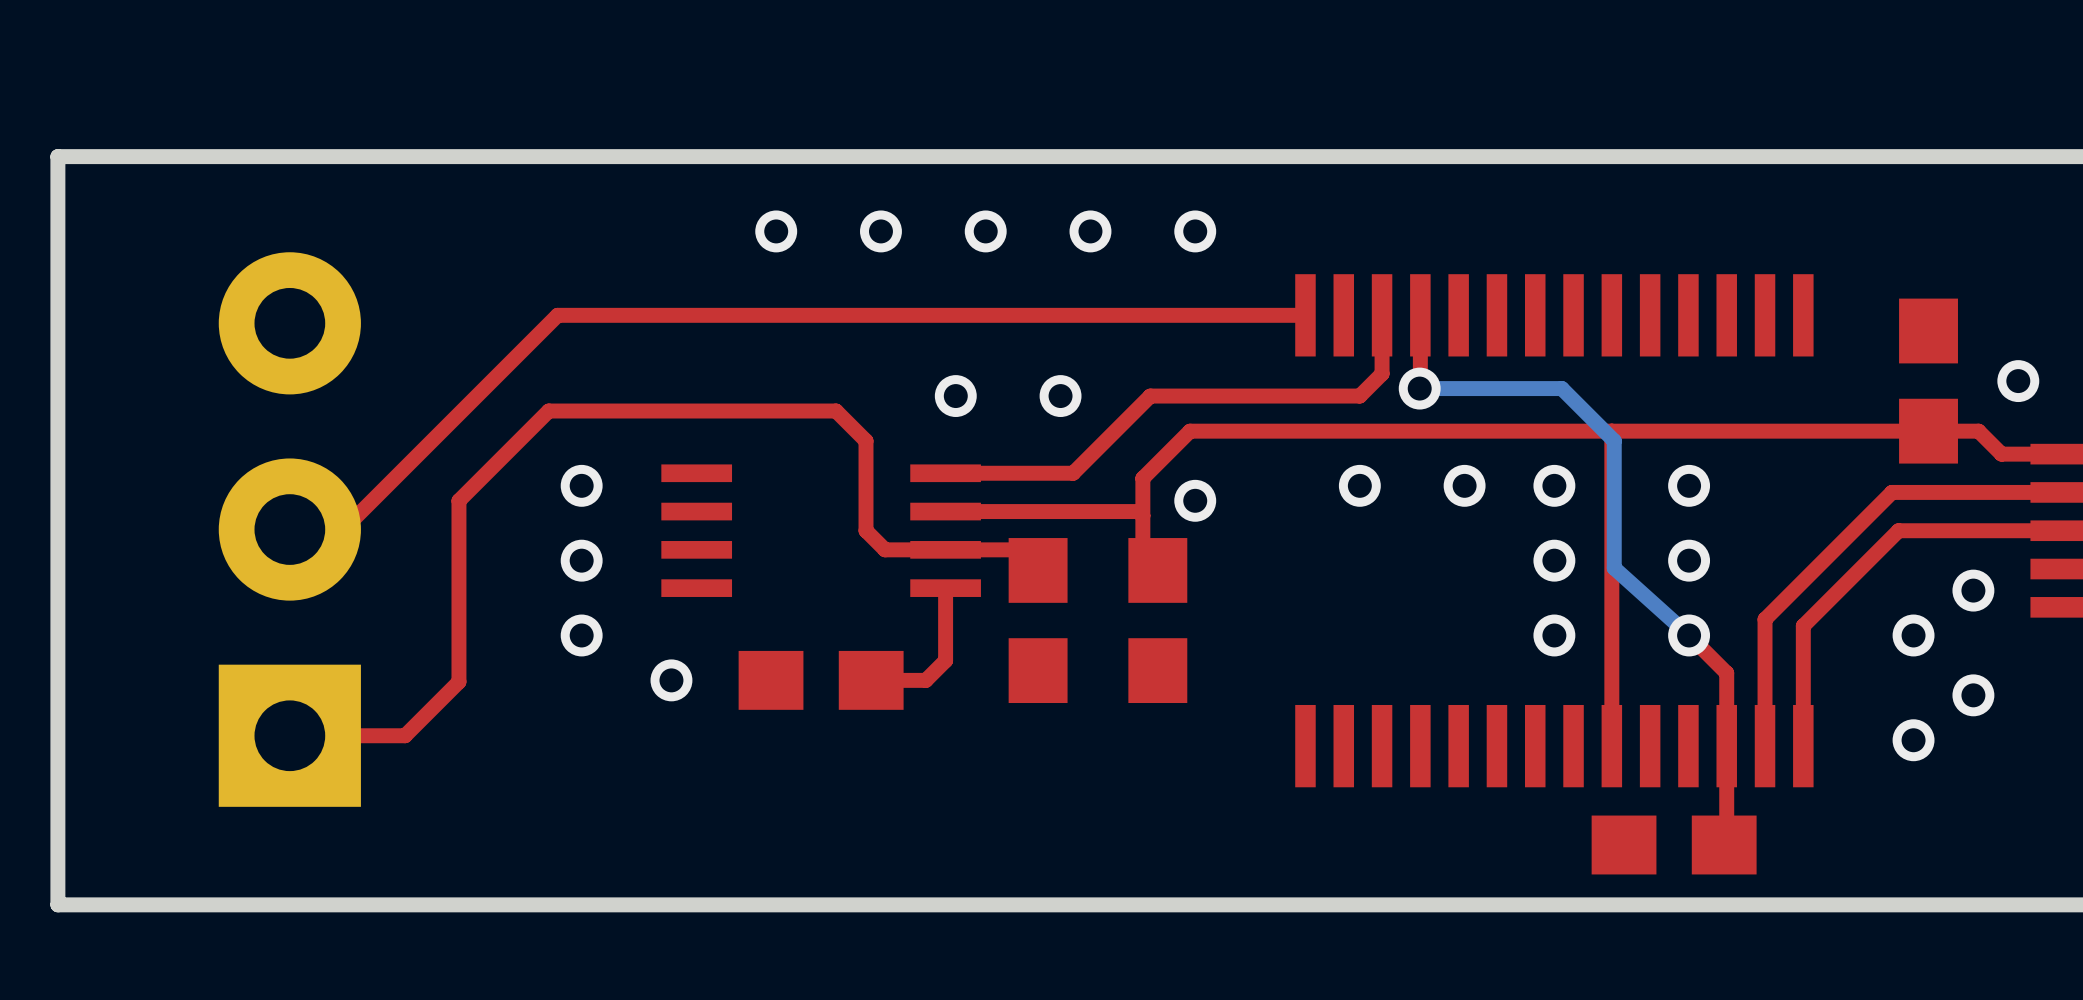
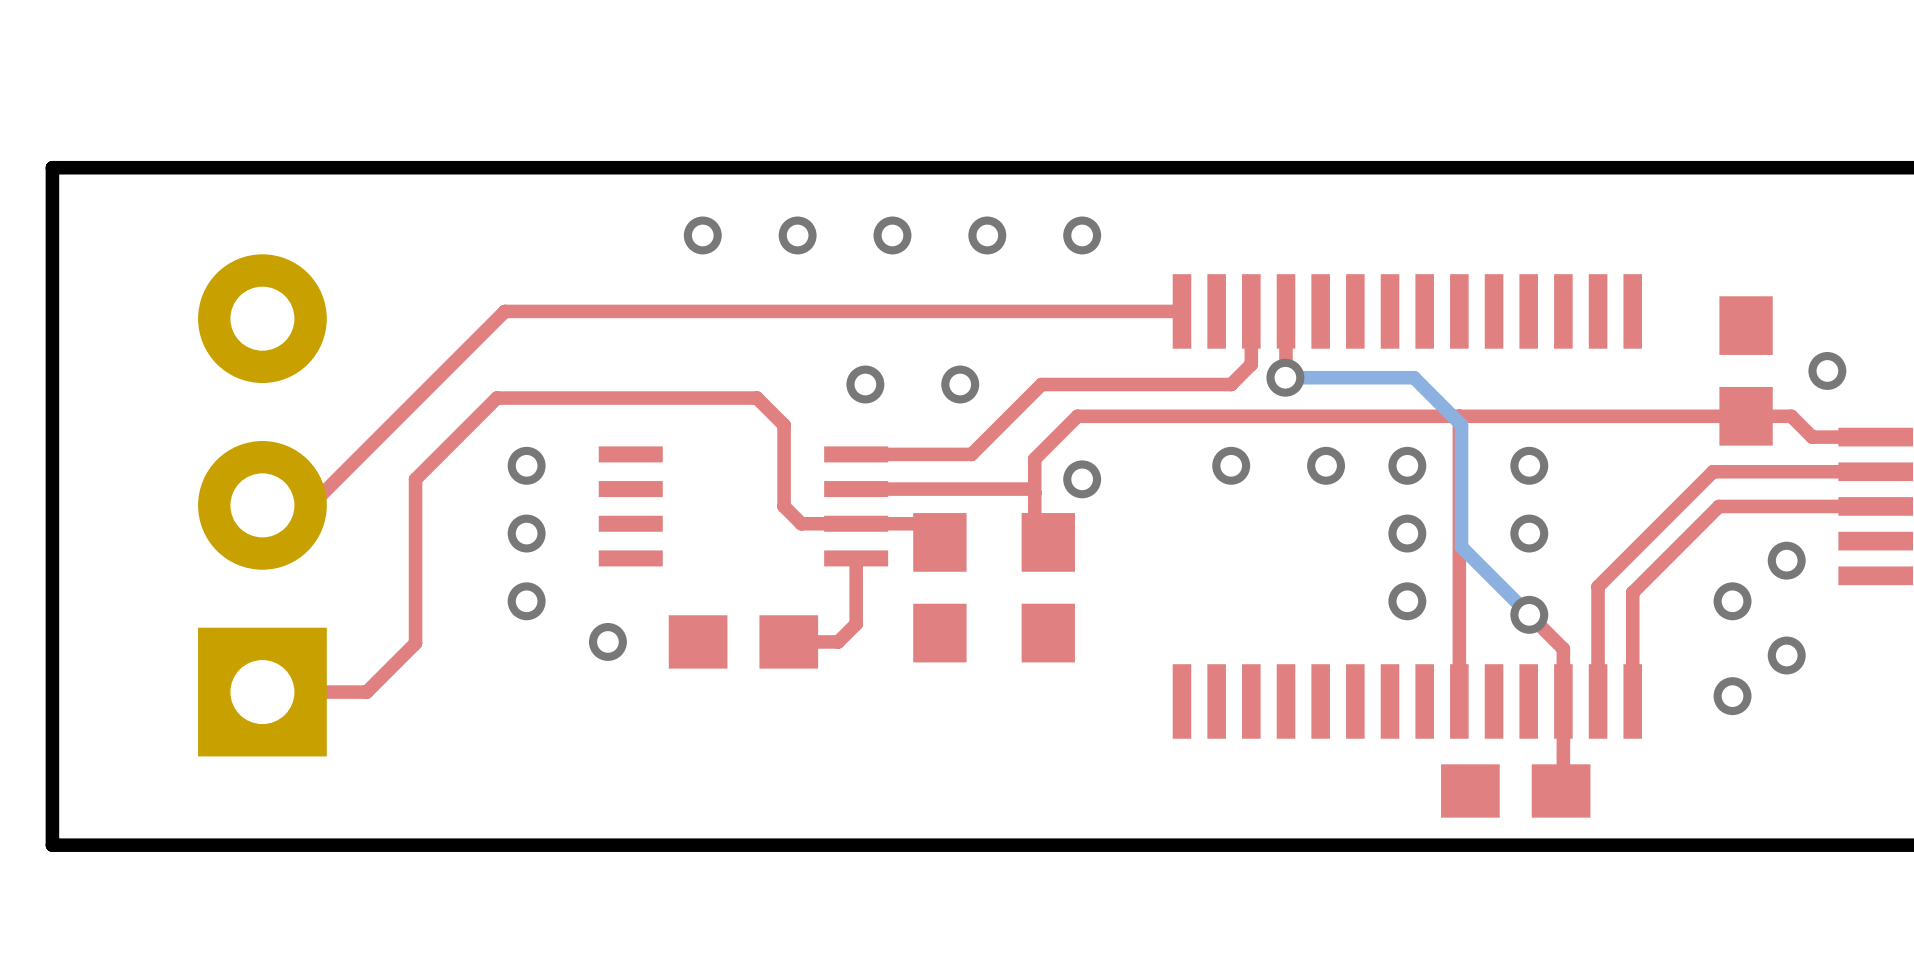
bottom track: (1614, 568) (1689, 635) -> (1461, 540) (1461, 547) (1529, 614)
top track: (1689, 635) (1726, 673) (1726, 688) -> (1529, 614) (1563, 648)
via position: (1689, 635) -> (1529, 614)

